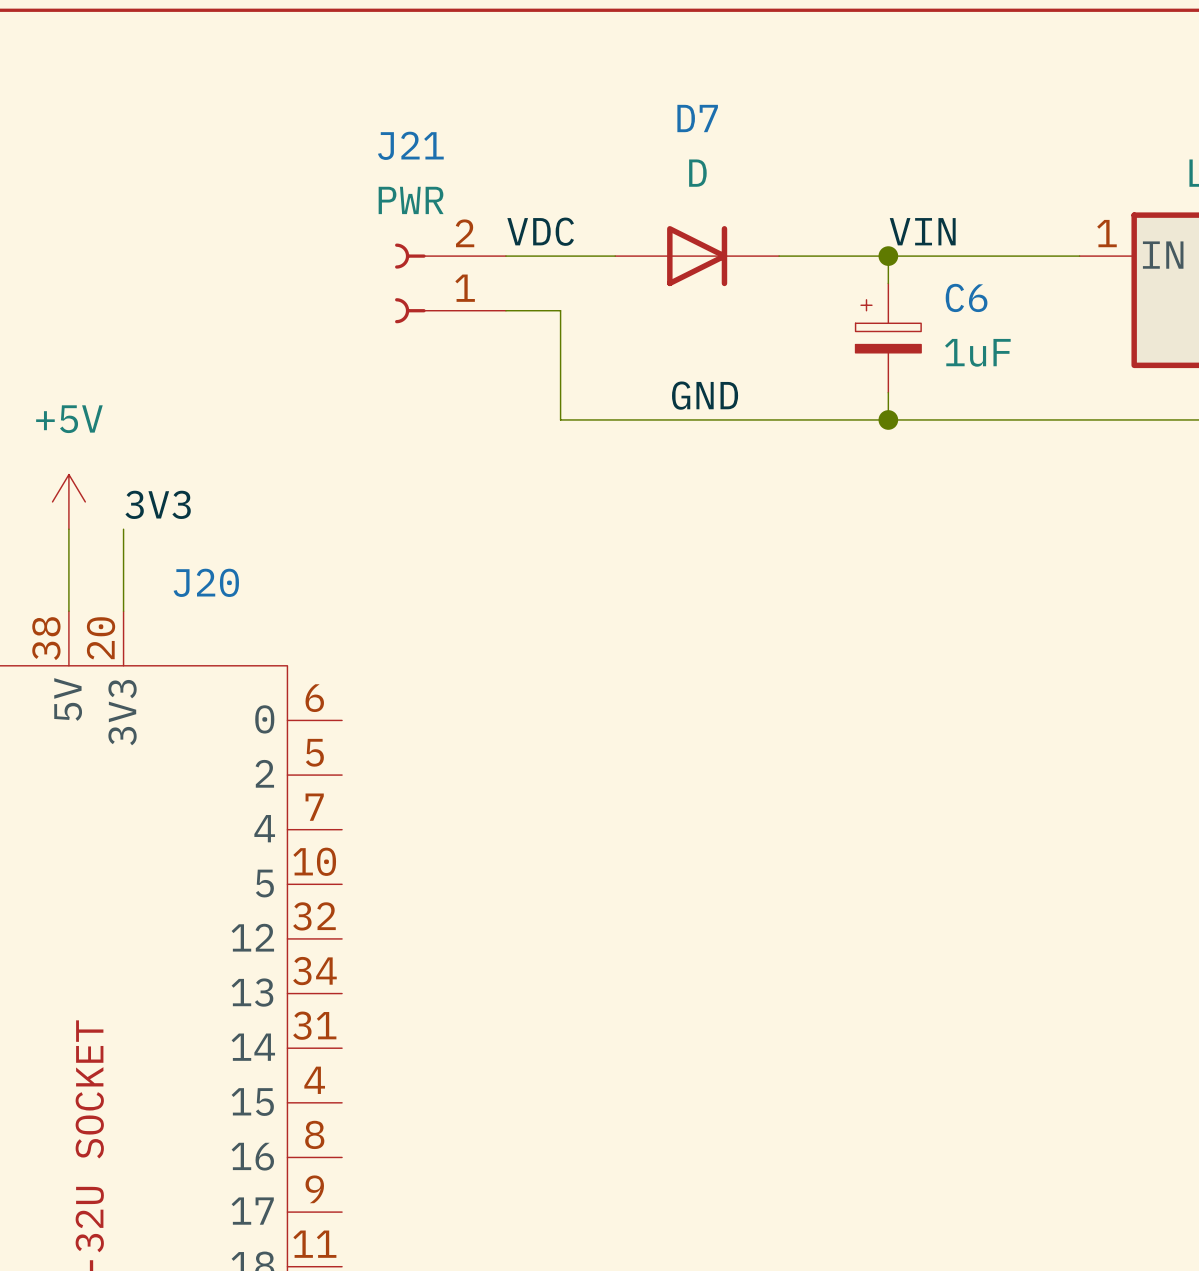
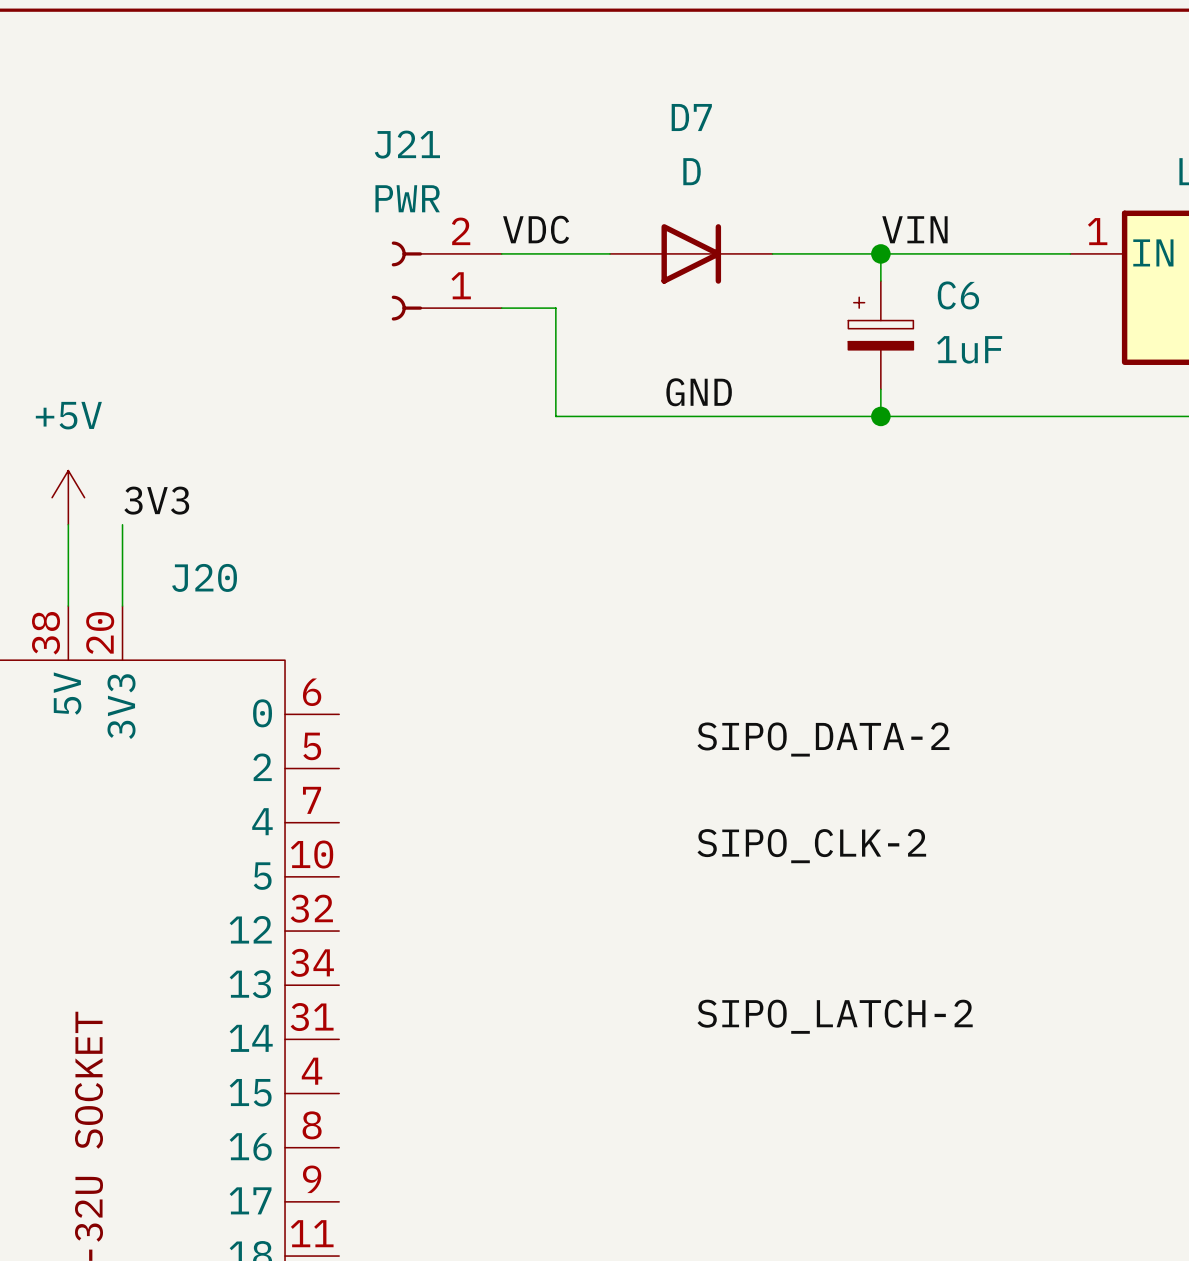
label: none -> SIPO_DATA-2 (823, 739)
label: none -> SIPO_CLK-2 (811, 846)
label: none -> SIPO_LATCH-2 (835, 1016)

